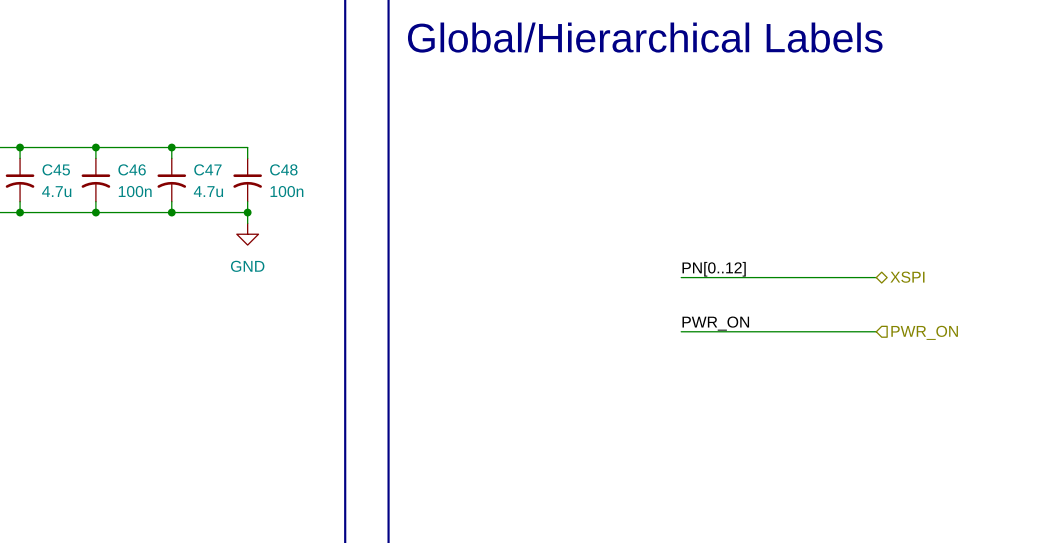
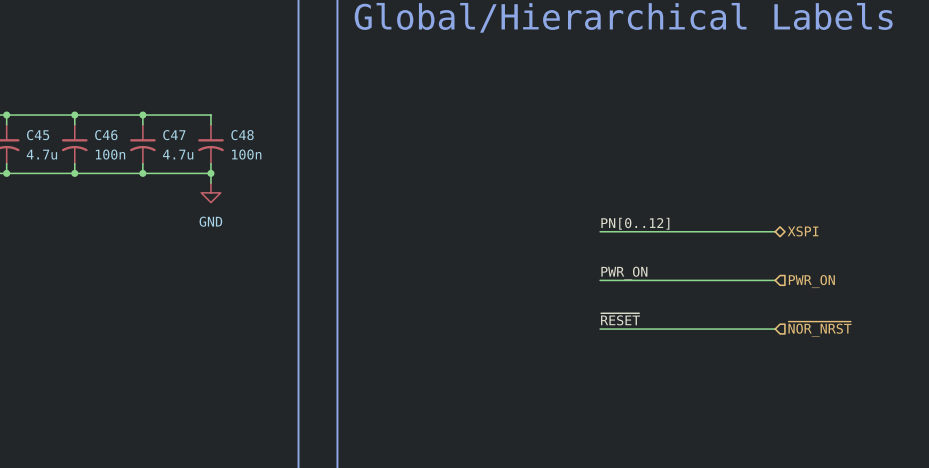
label: none -> ~{RESET} (620, 319)
wire: none -> (600, 329) (775, 329)
hierarchical label: none -> ~{NOR_NRST} (819, 329)

